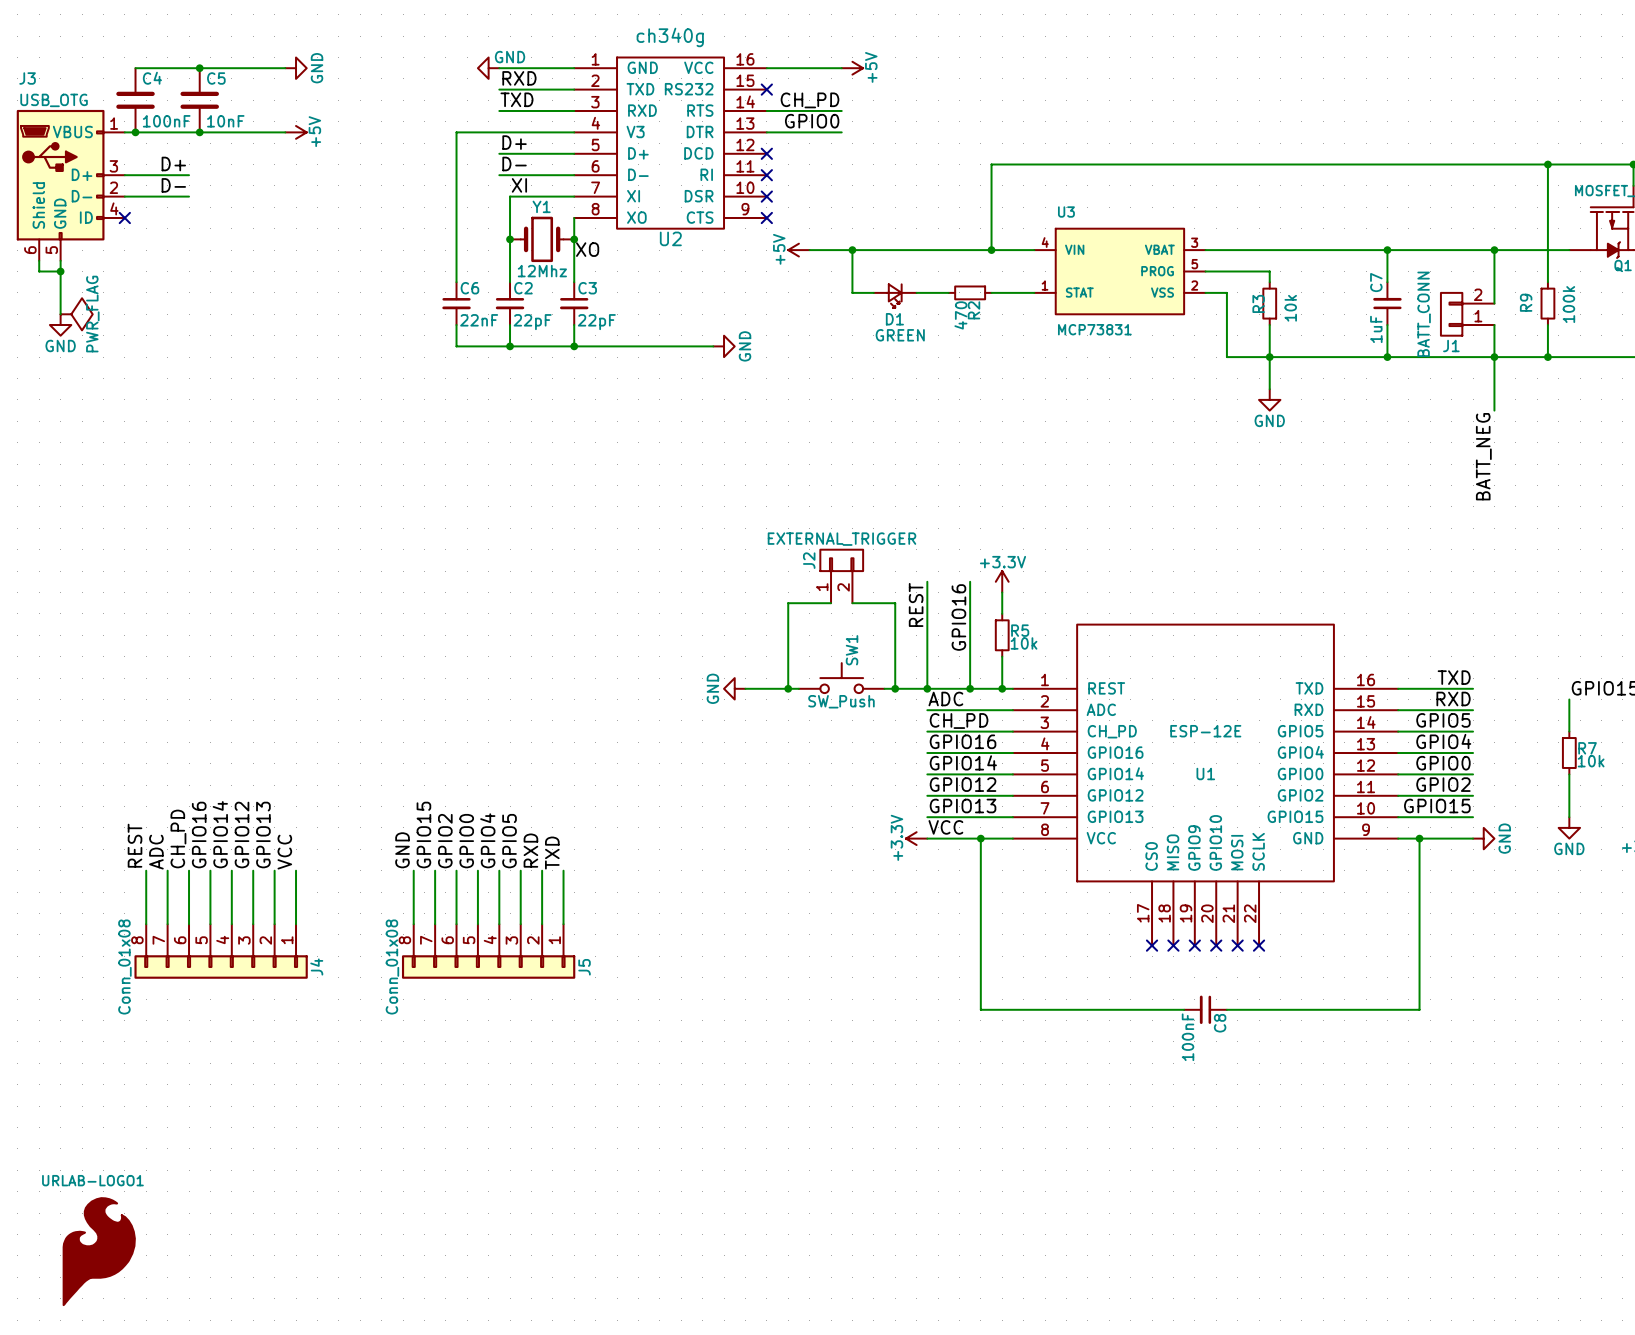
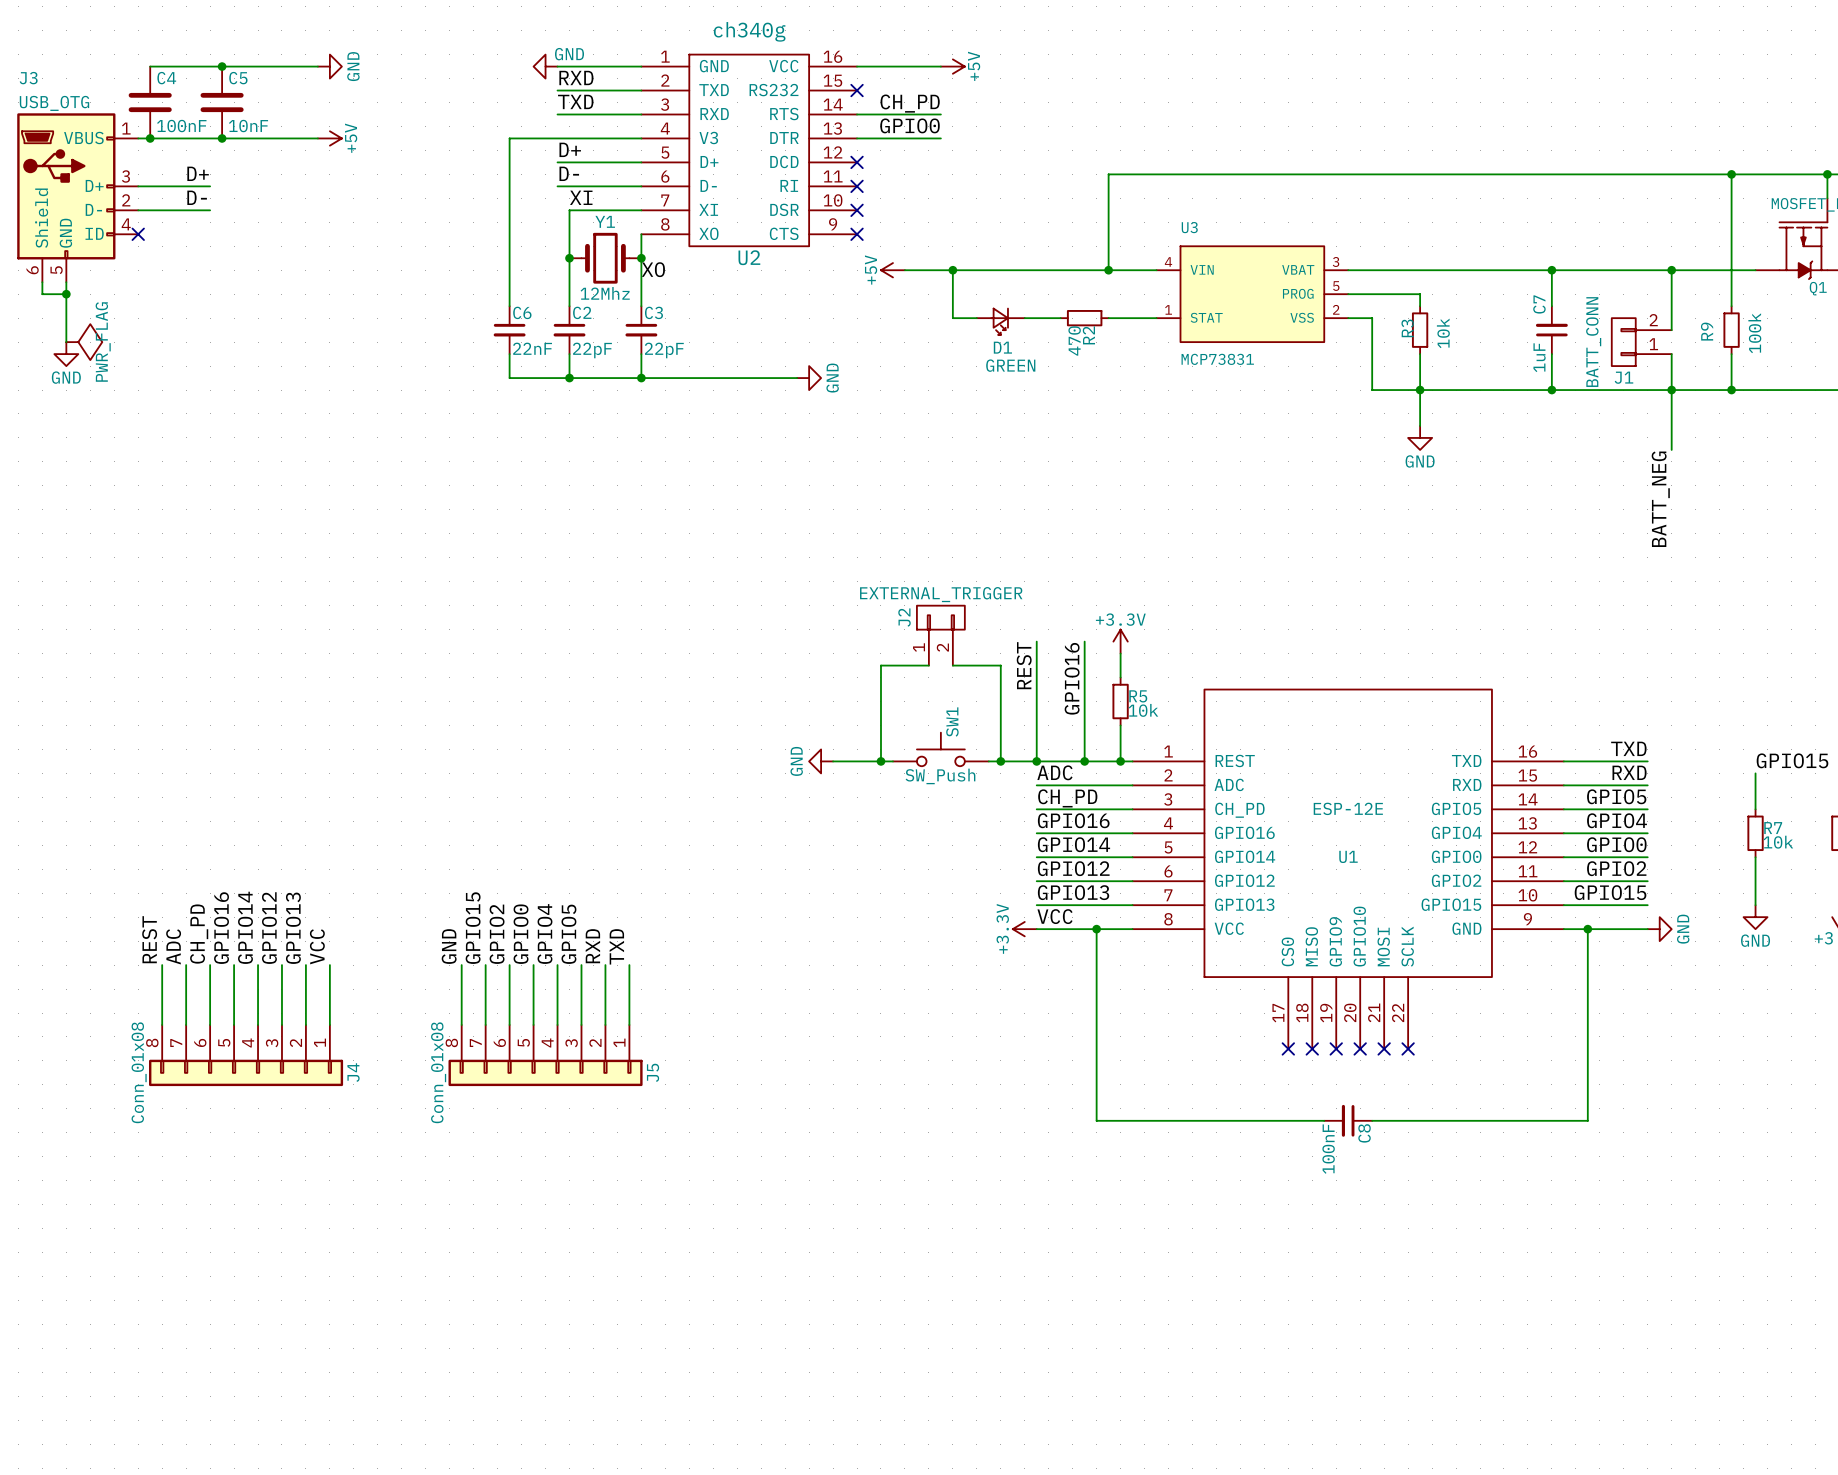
URLAB-LOGO1: (99, 1251) -> none

